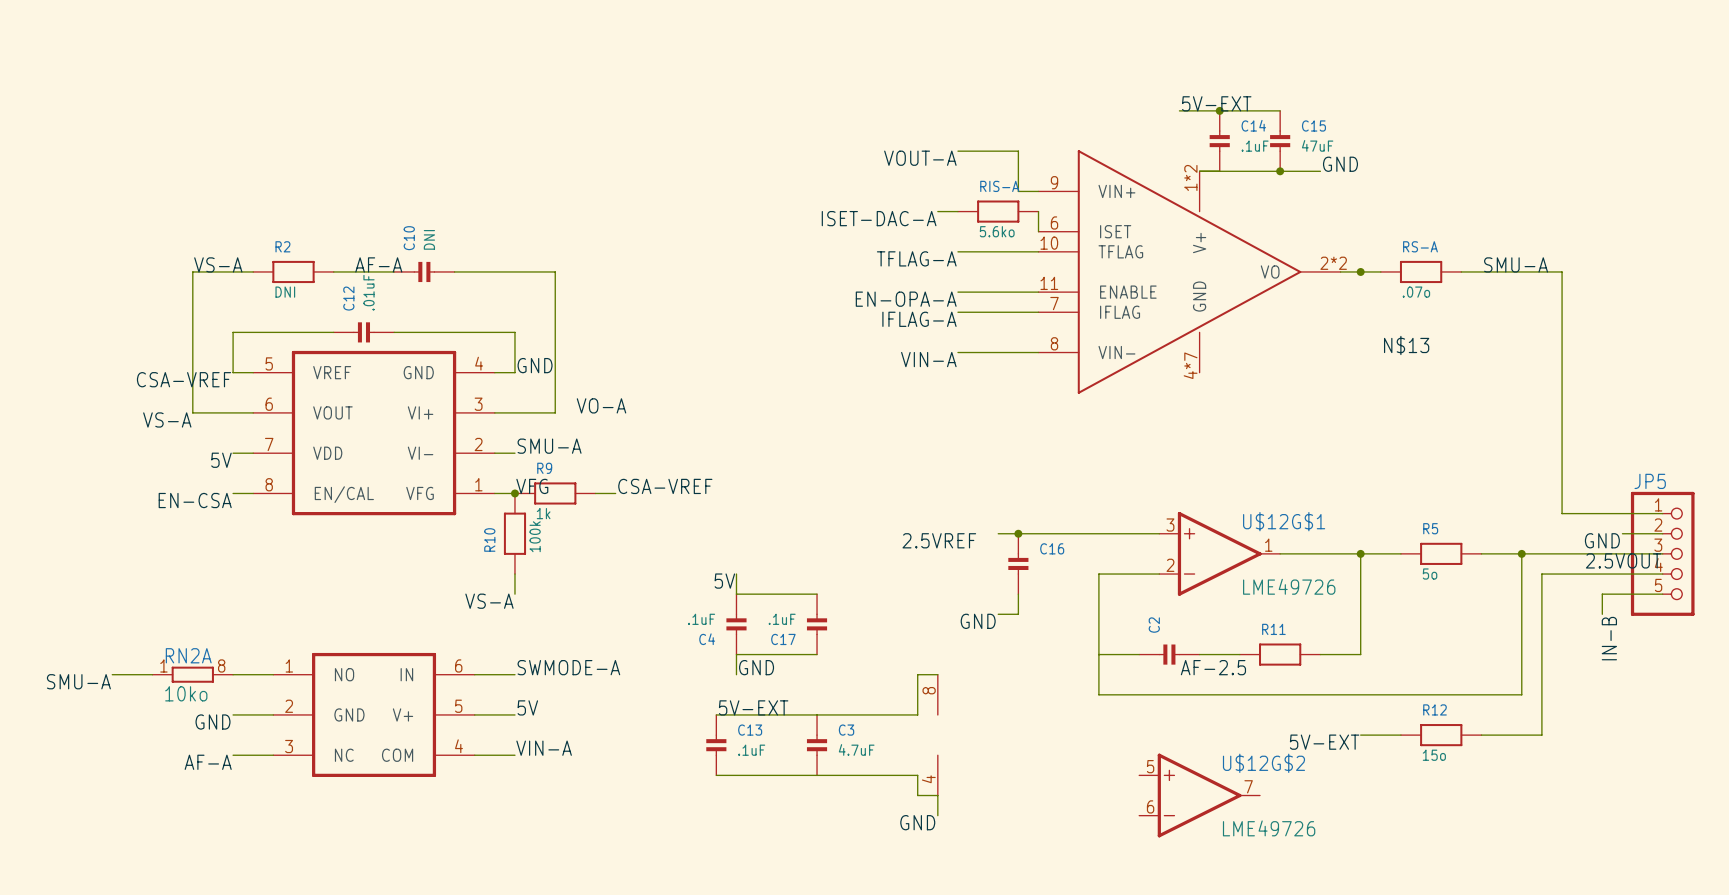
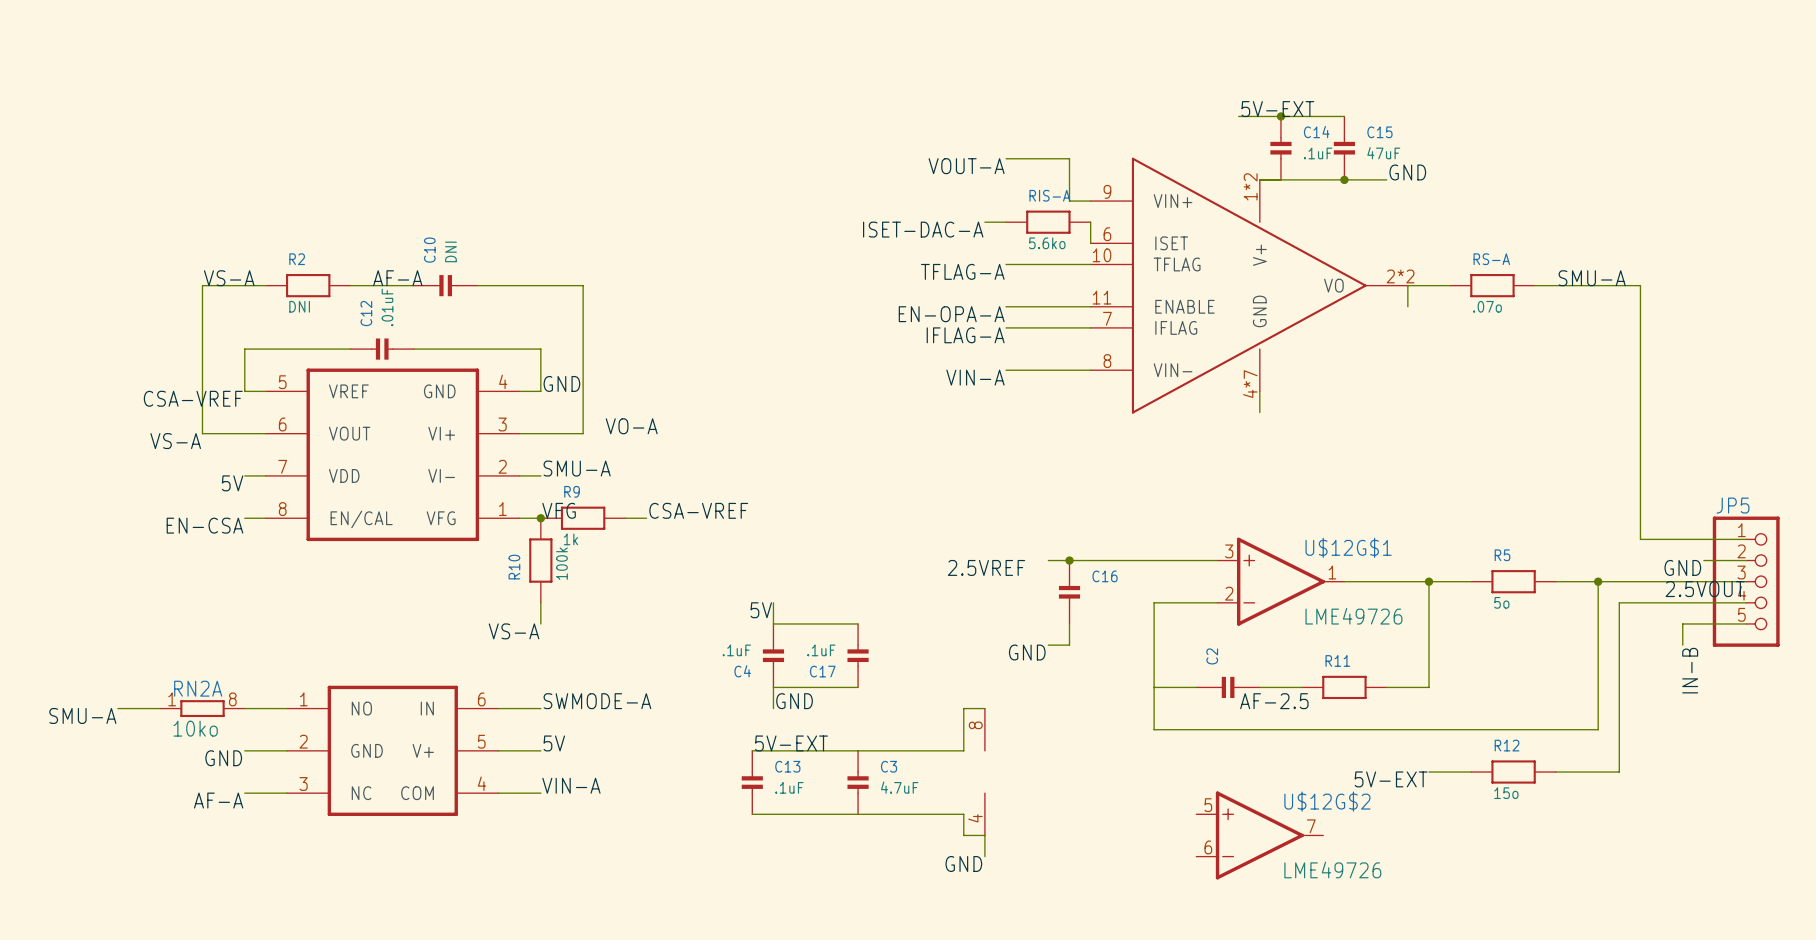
wire: none -> (1407, 285) (1407, 306)
junction: (1360, 271) -> none
label: N$13 (1406, 345) -> none
wire: none -> (1259, 391) (1259, 412)

